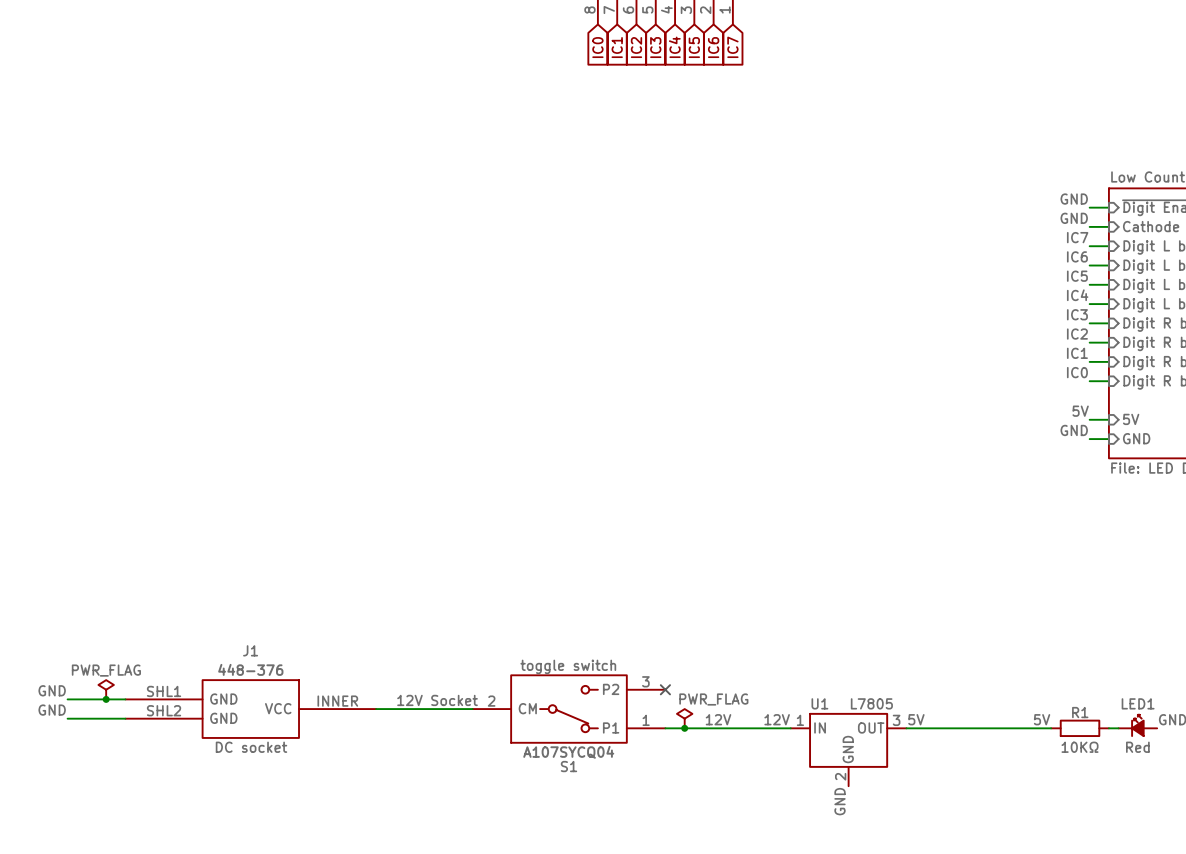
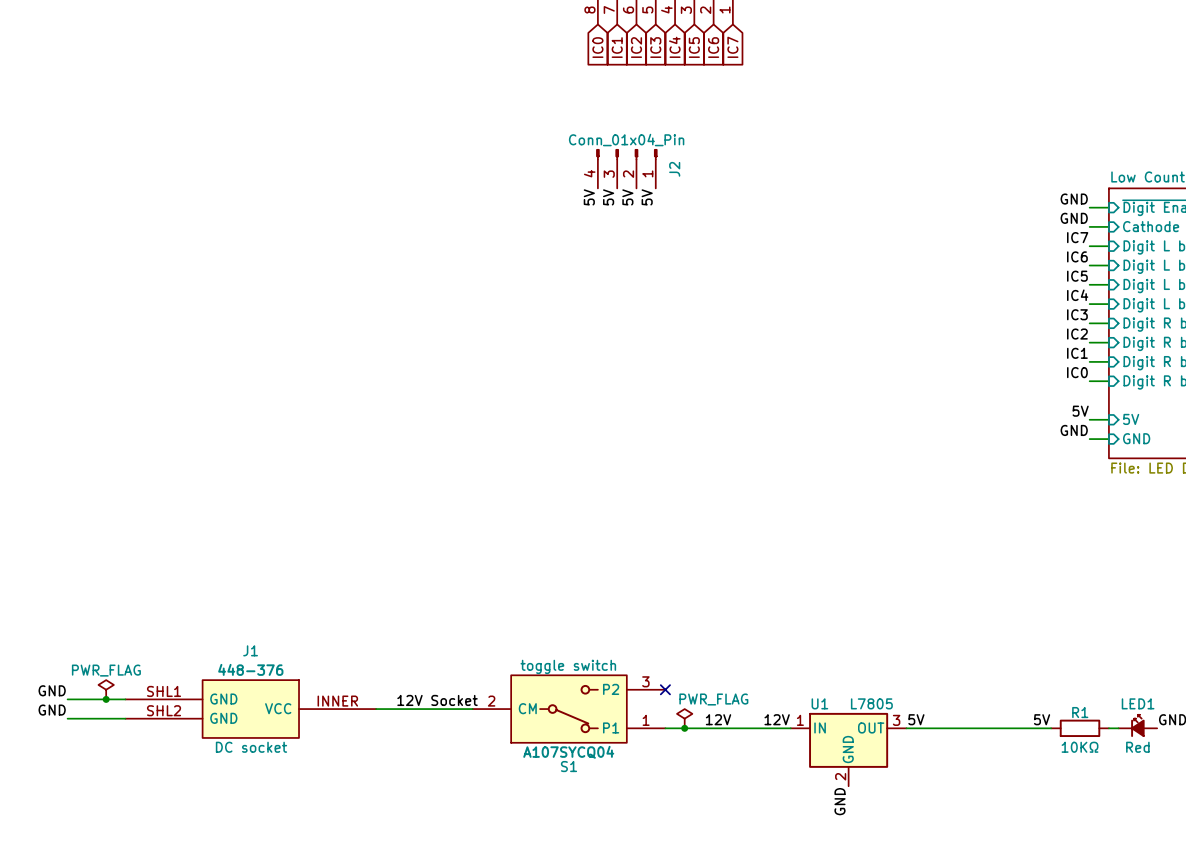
J2: none -> Conn_01x04_Pin (626, 168)
label: none -> 5V (589, 197)
label: none -> 5V (608, 197)
label: none -> 5V (627, 197)
label: none -> 5V (647, 197)

